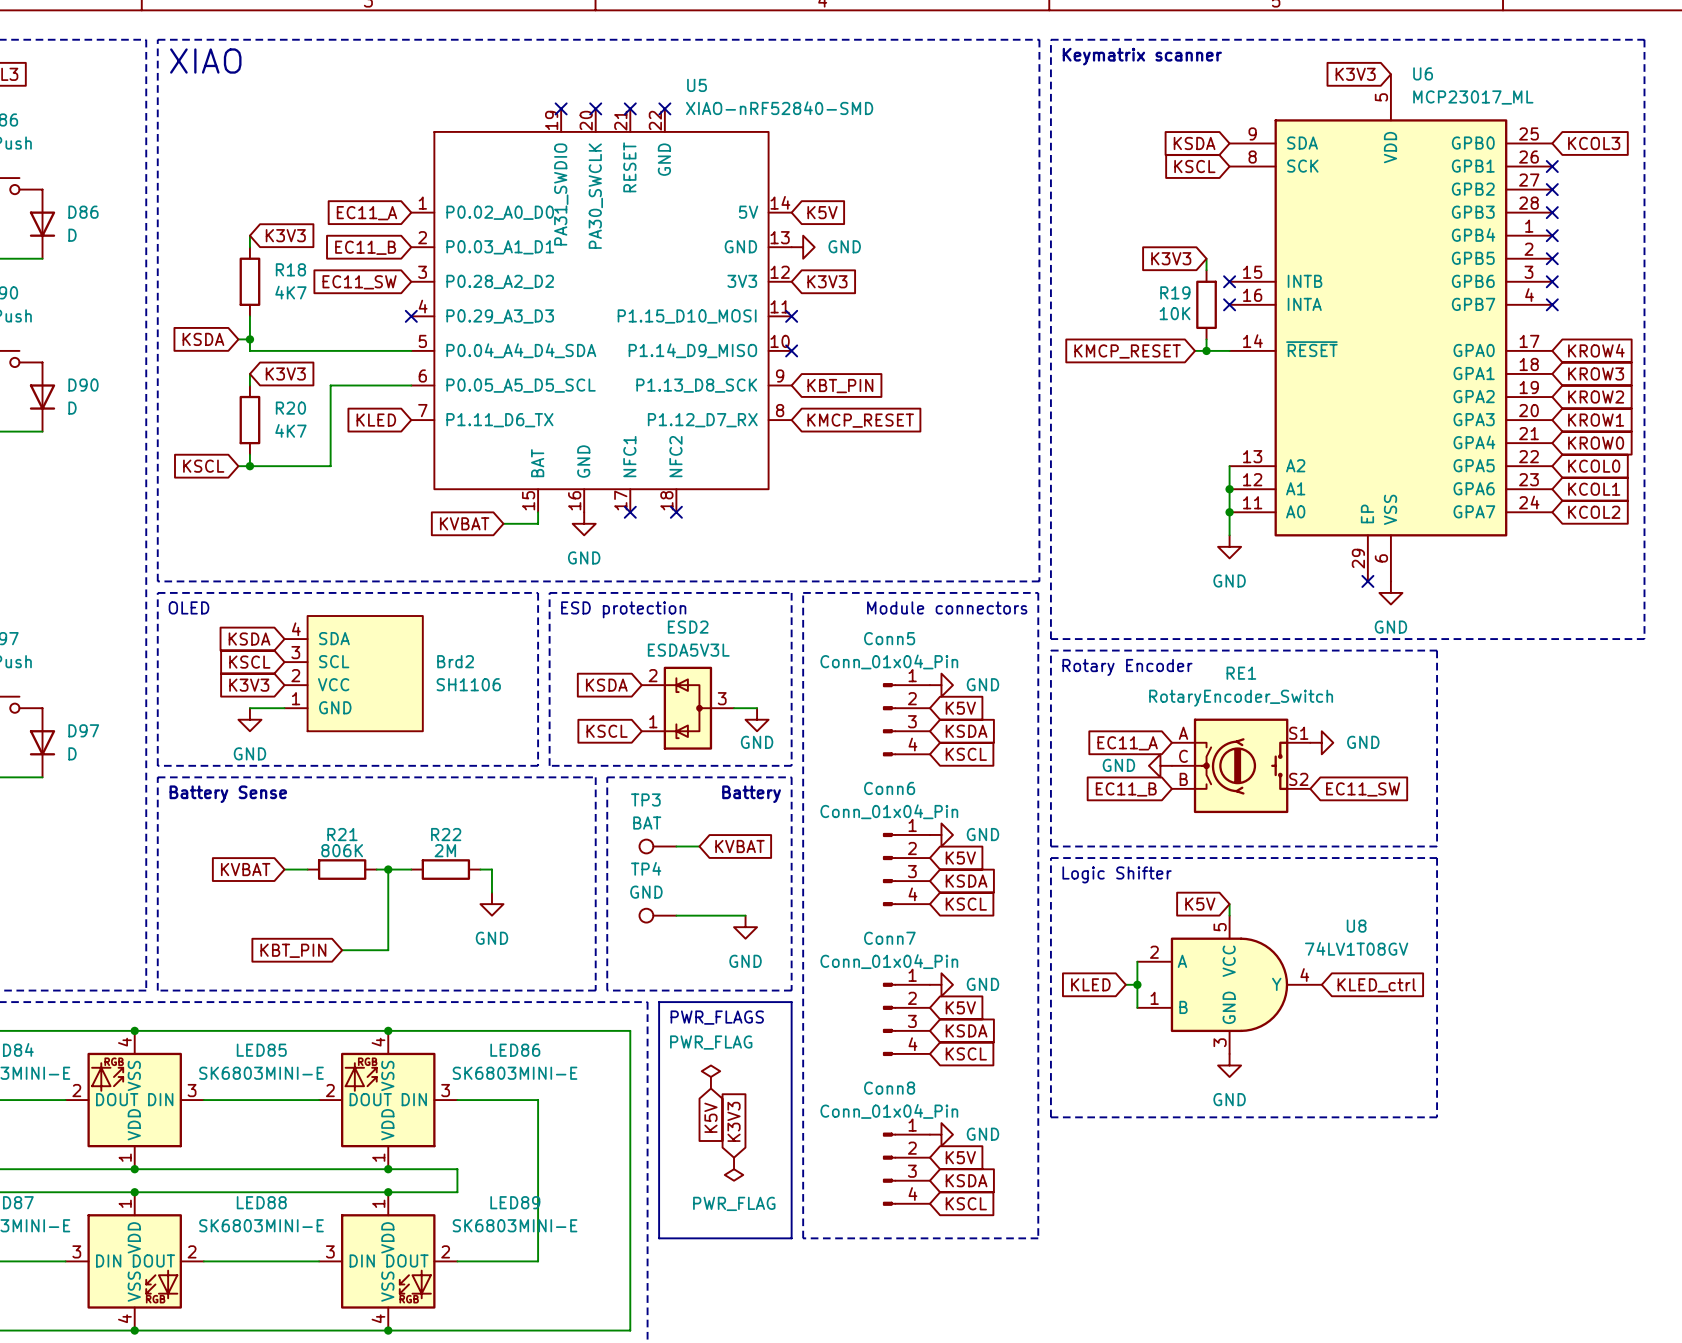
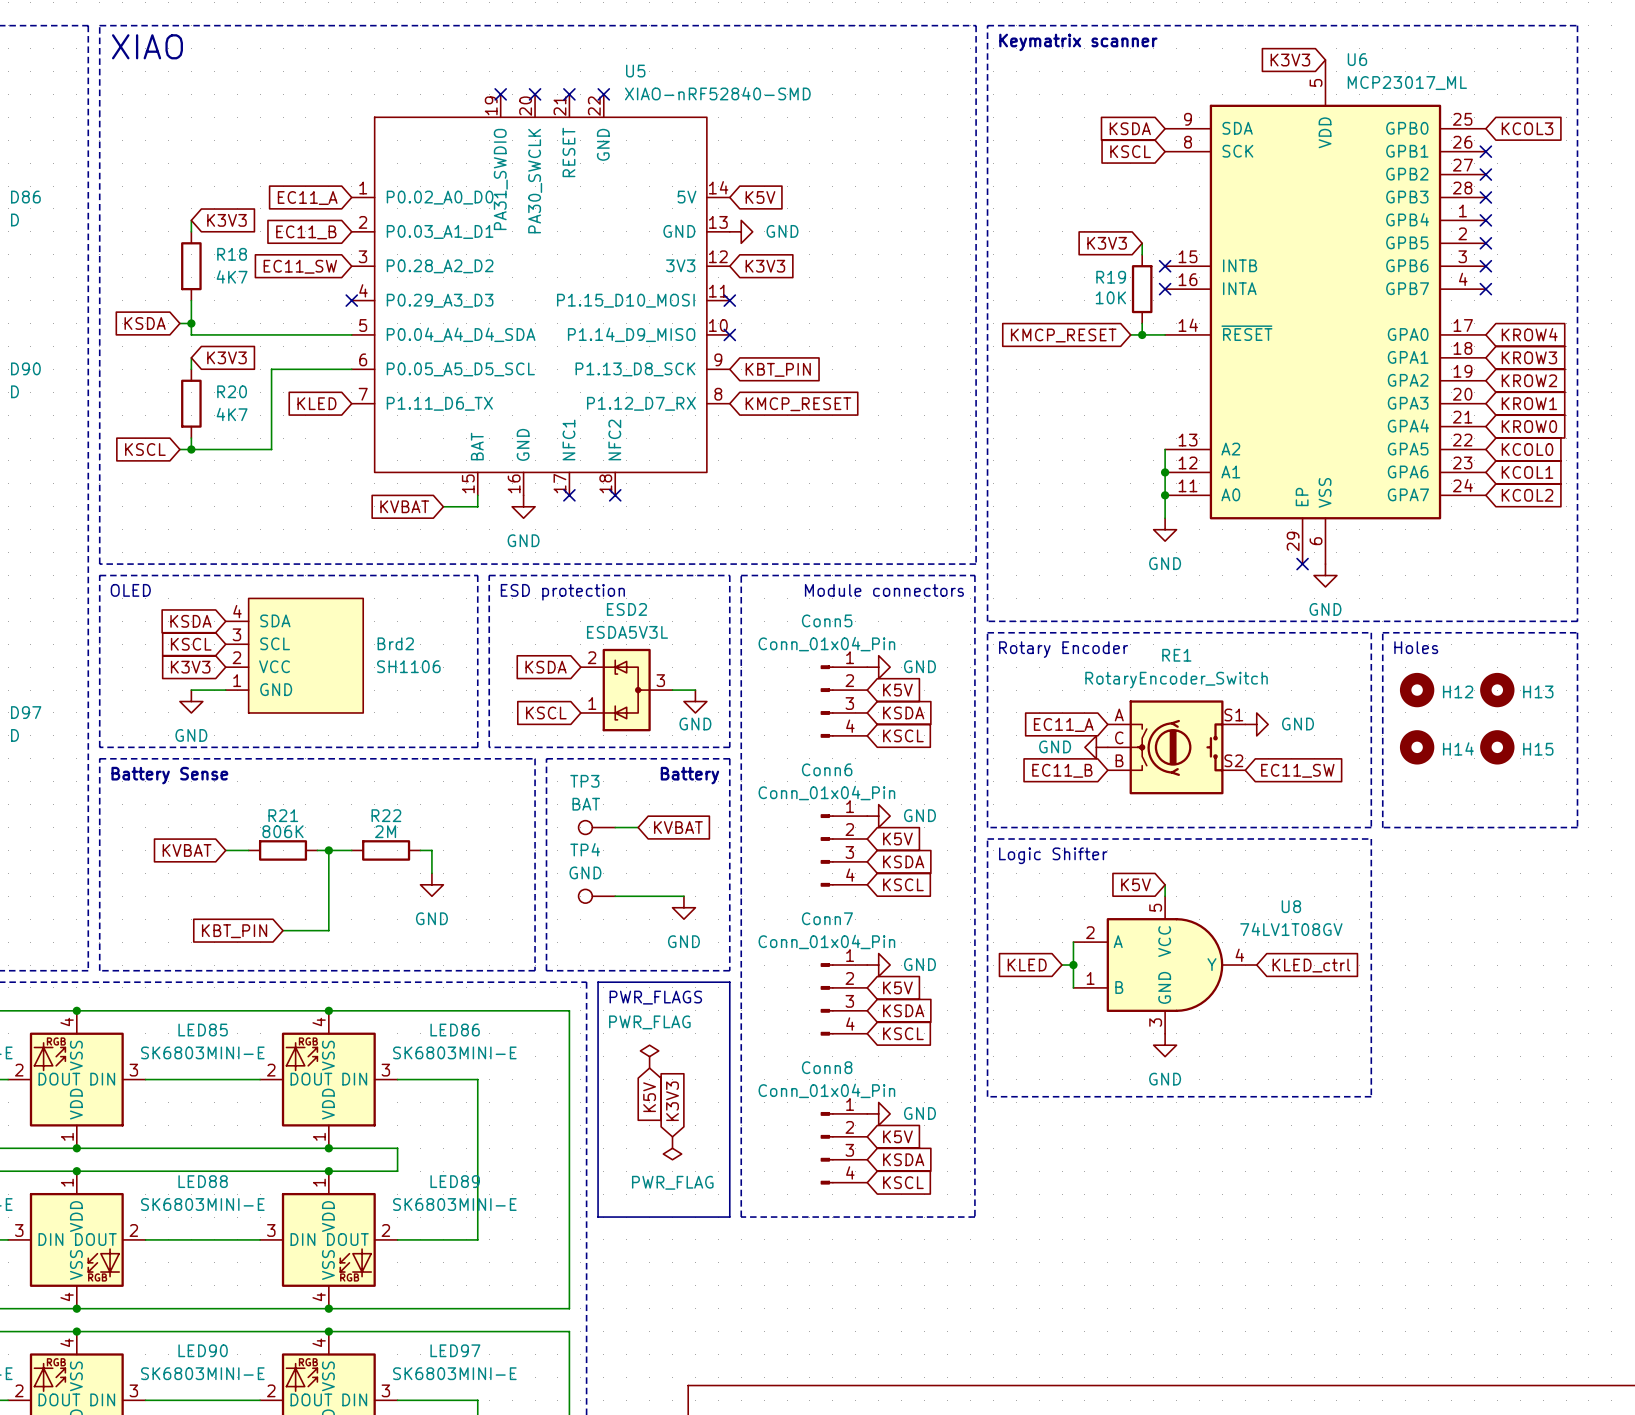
line: none -> (1382, 632) (1577, 632) (1577, 827) (1382, 827) (1382, 632)
text: none -> Holes (1416, 647)
H12: none -> (1417, 690)
H13: none -> (1497, 690)
H14: none -> (1417, 747)
H15: none -> (1497, 747)

